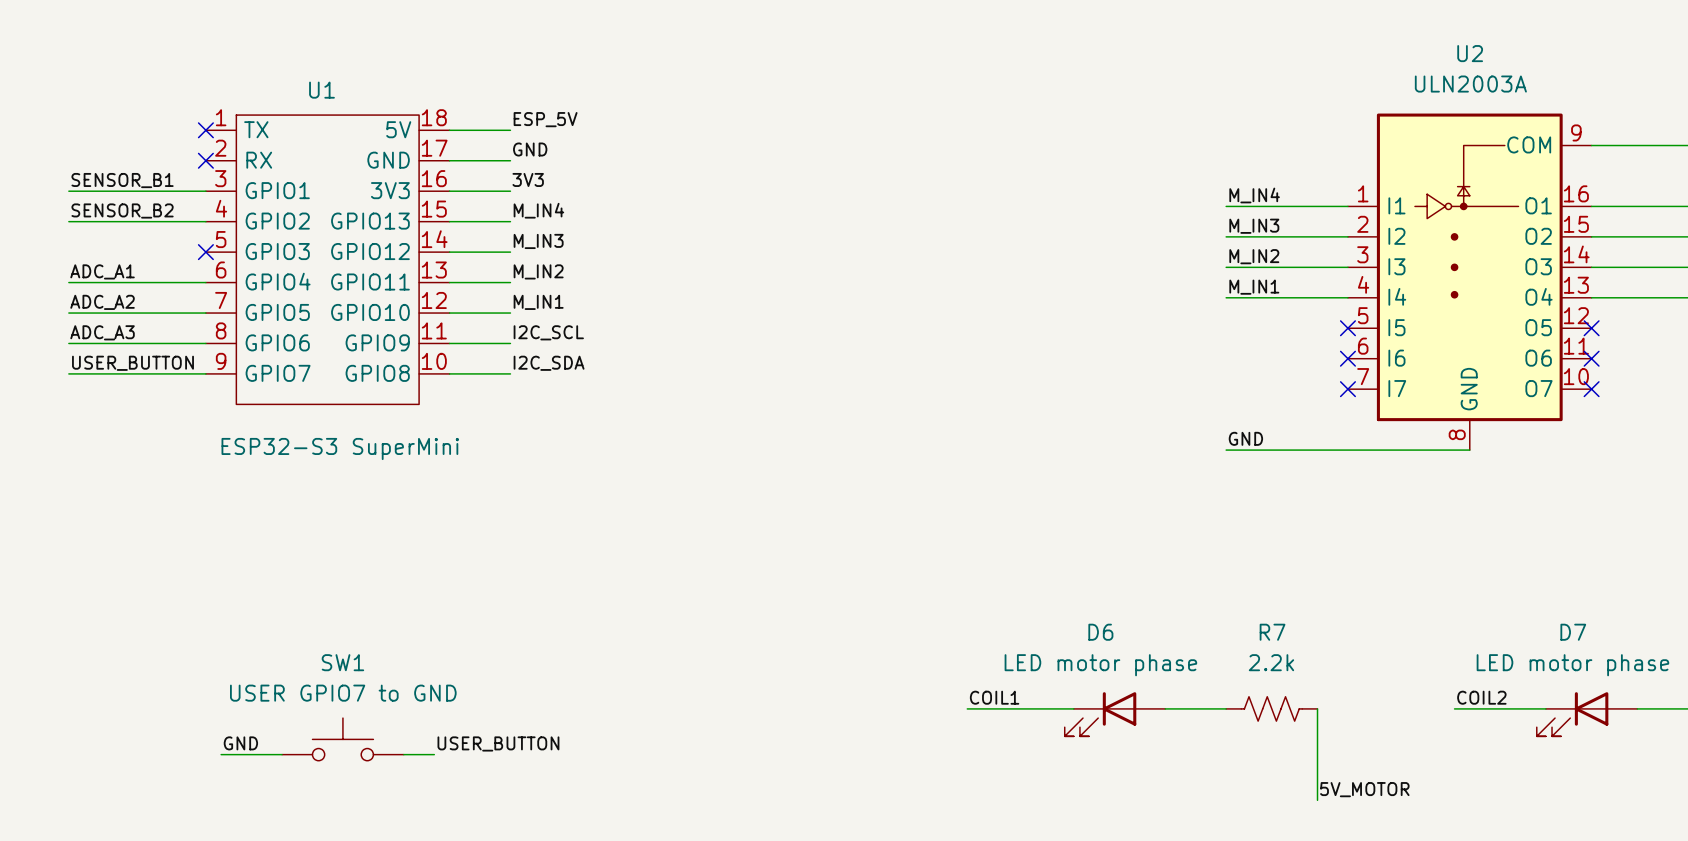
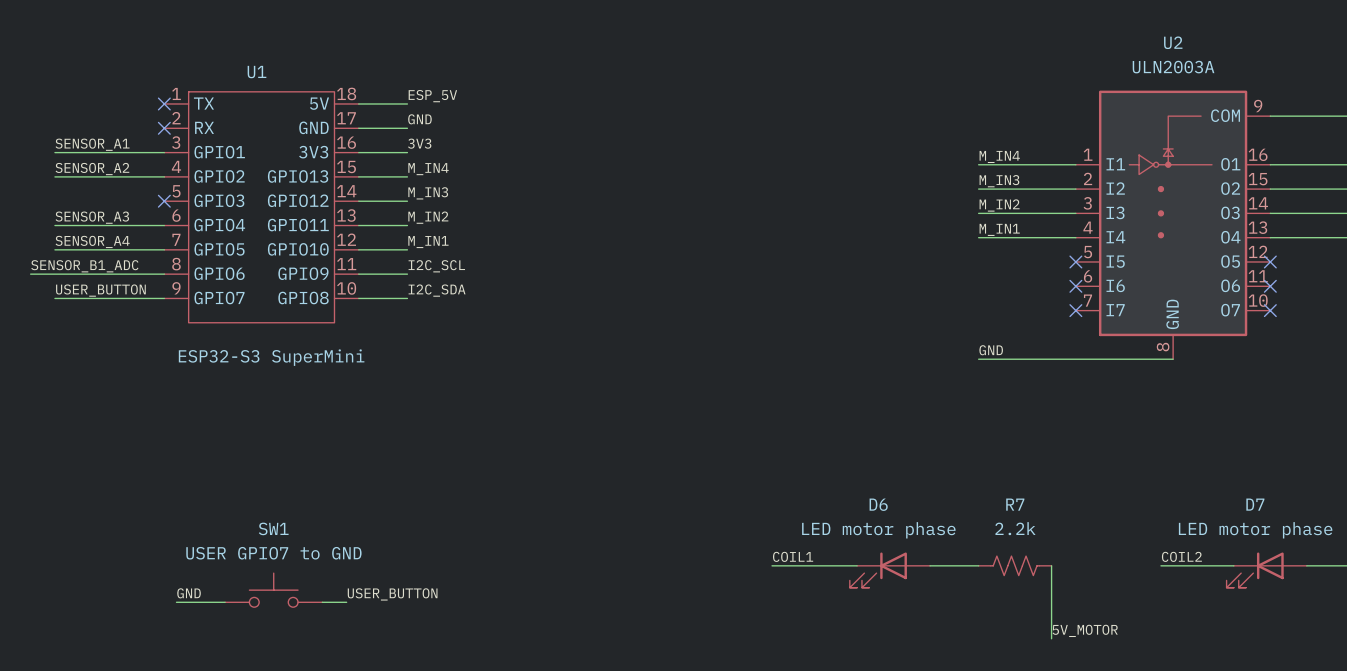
label: SENSOR_B1 (122, 180) -> SENSOR_A1 (92, 144)
label: SENSOR_B2 (122, 211) -> SENSOR_A2 (92, 169)
label: ADC_A1 (102, 271) -> SENSOR_A3 (92, 217)
label: ADC_A2 (102, 302) -> SENSOR_A4 (92, 241)
label: ADC_A3 (102, 332) -> none
label: none -> SENSOR_B1_ADC (84, 266)
wire: none -> (30, 274) (54, 274)

